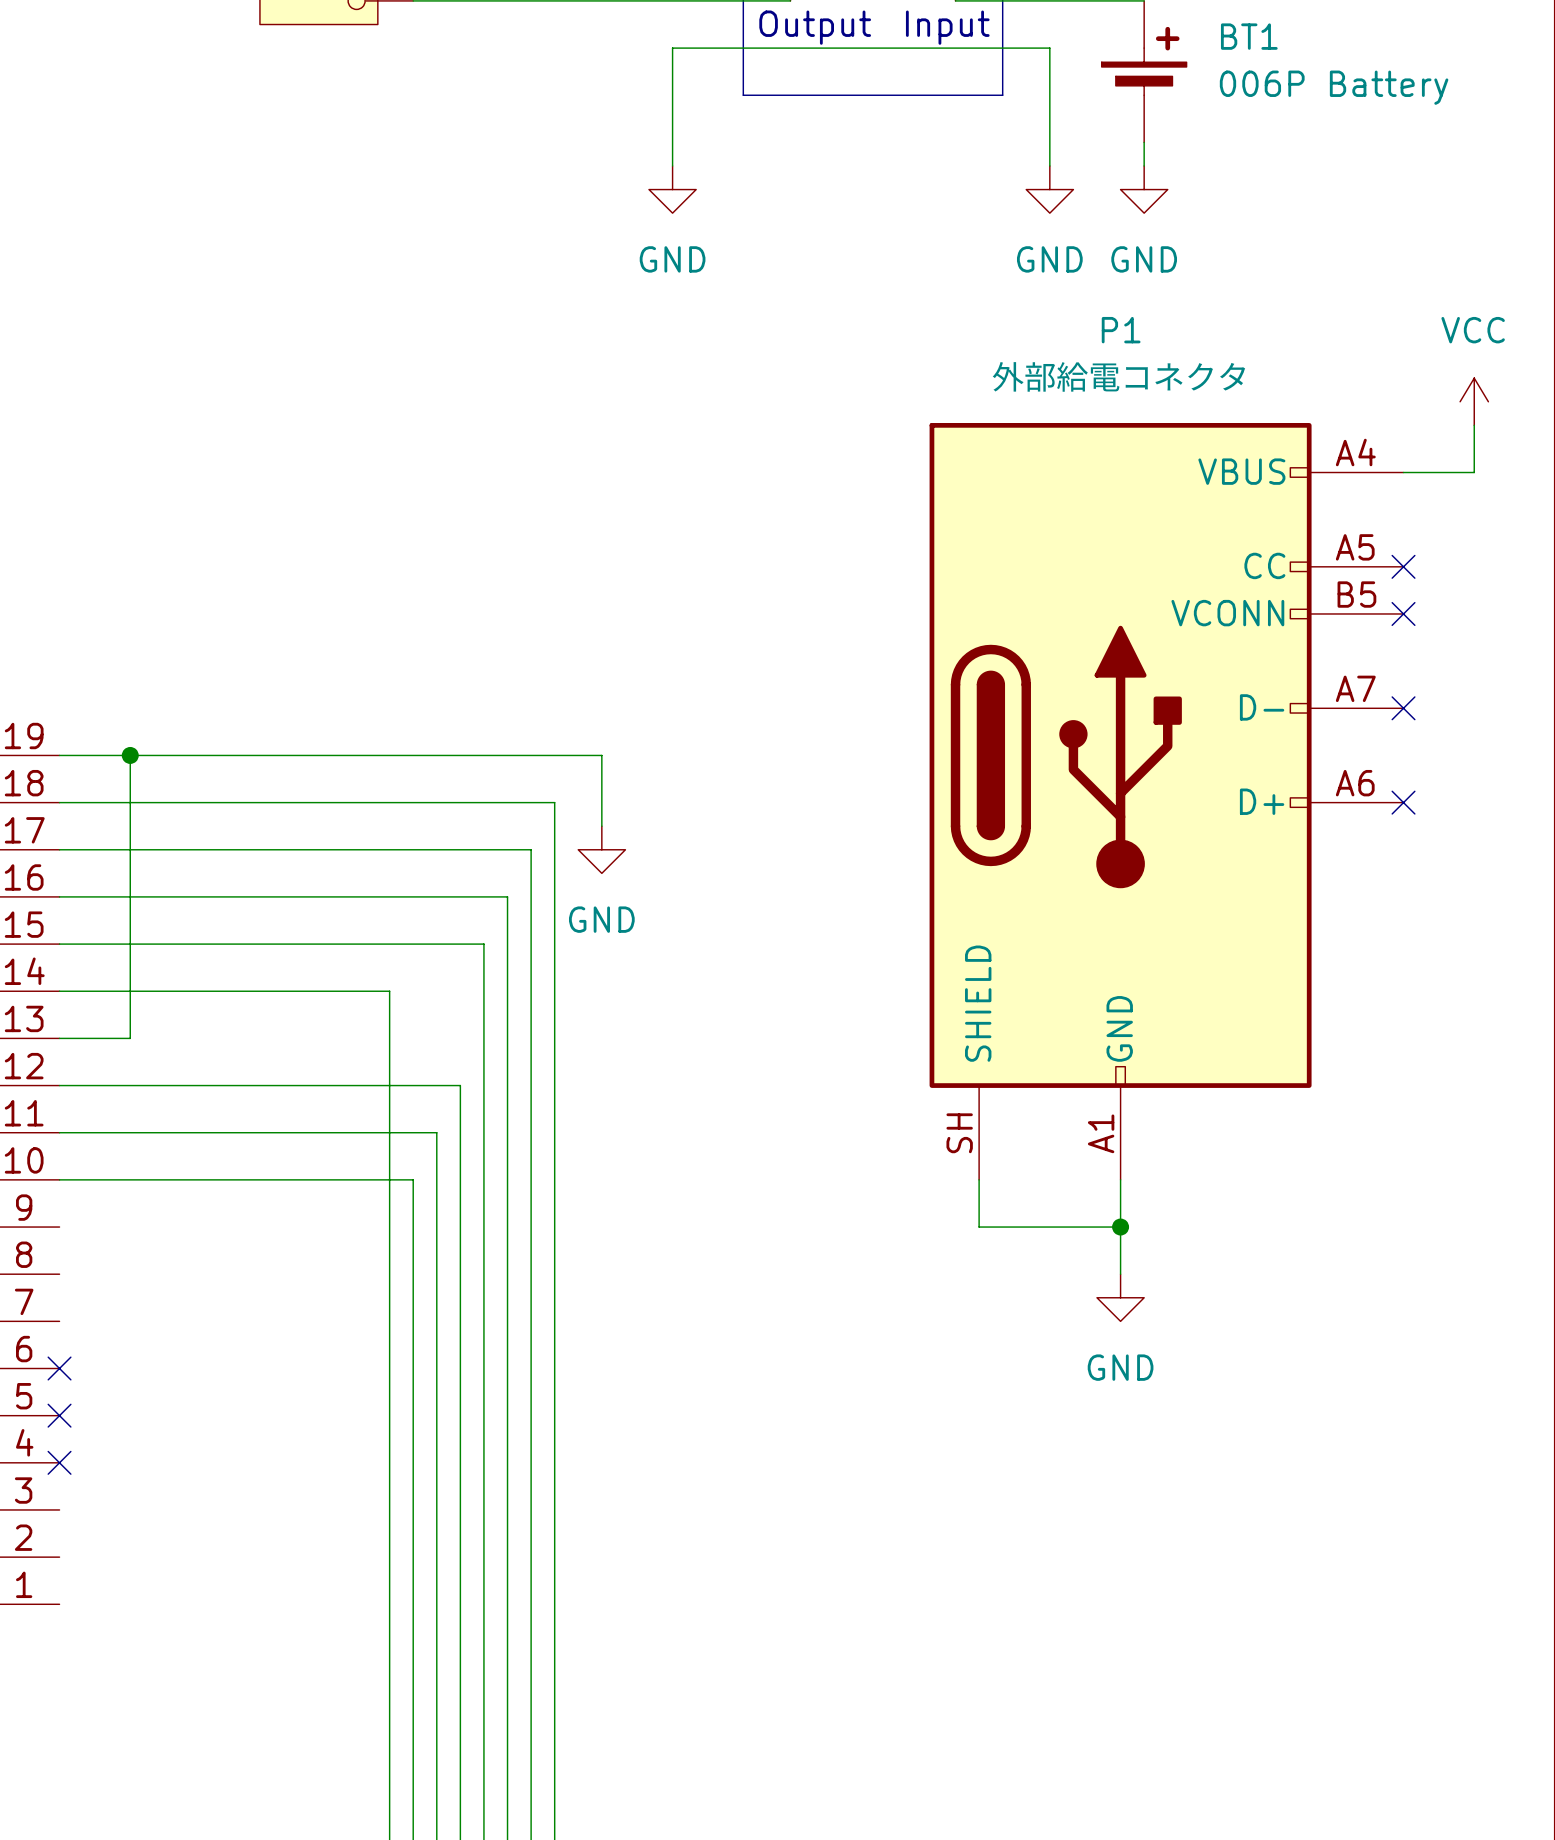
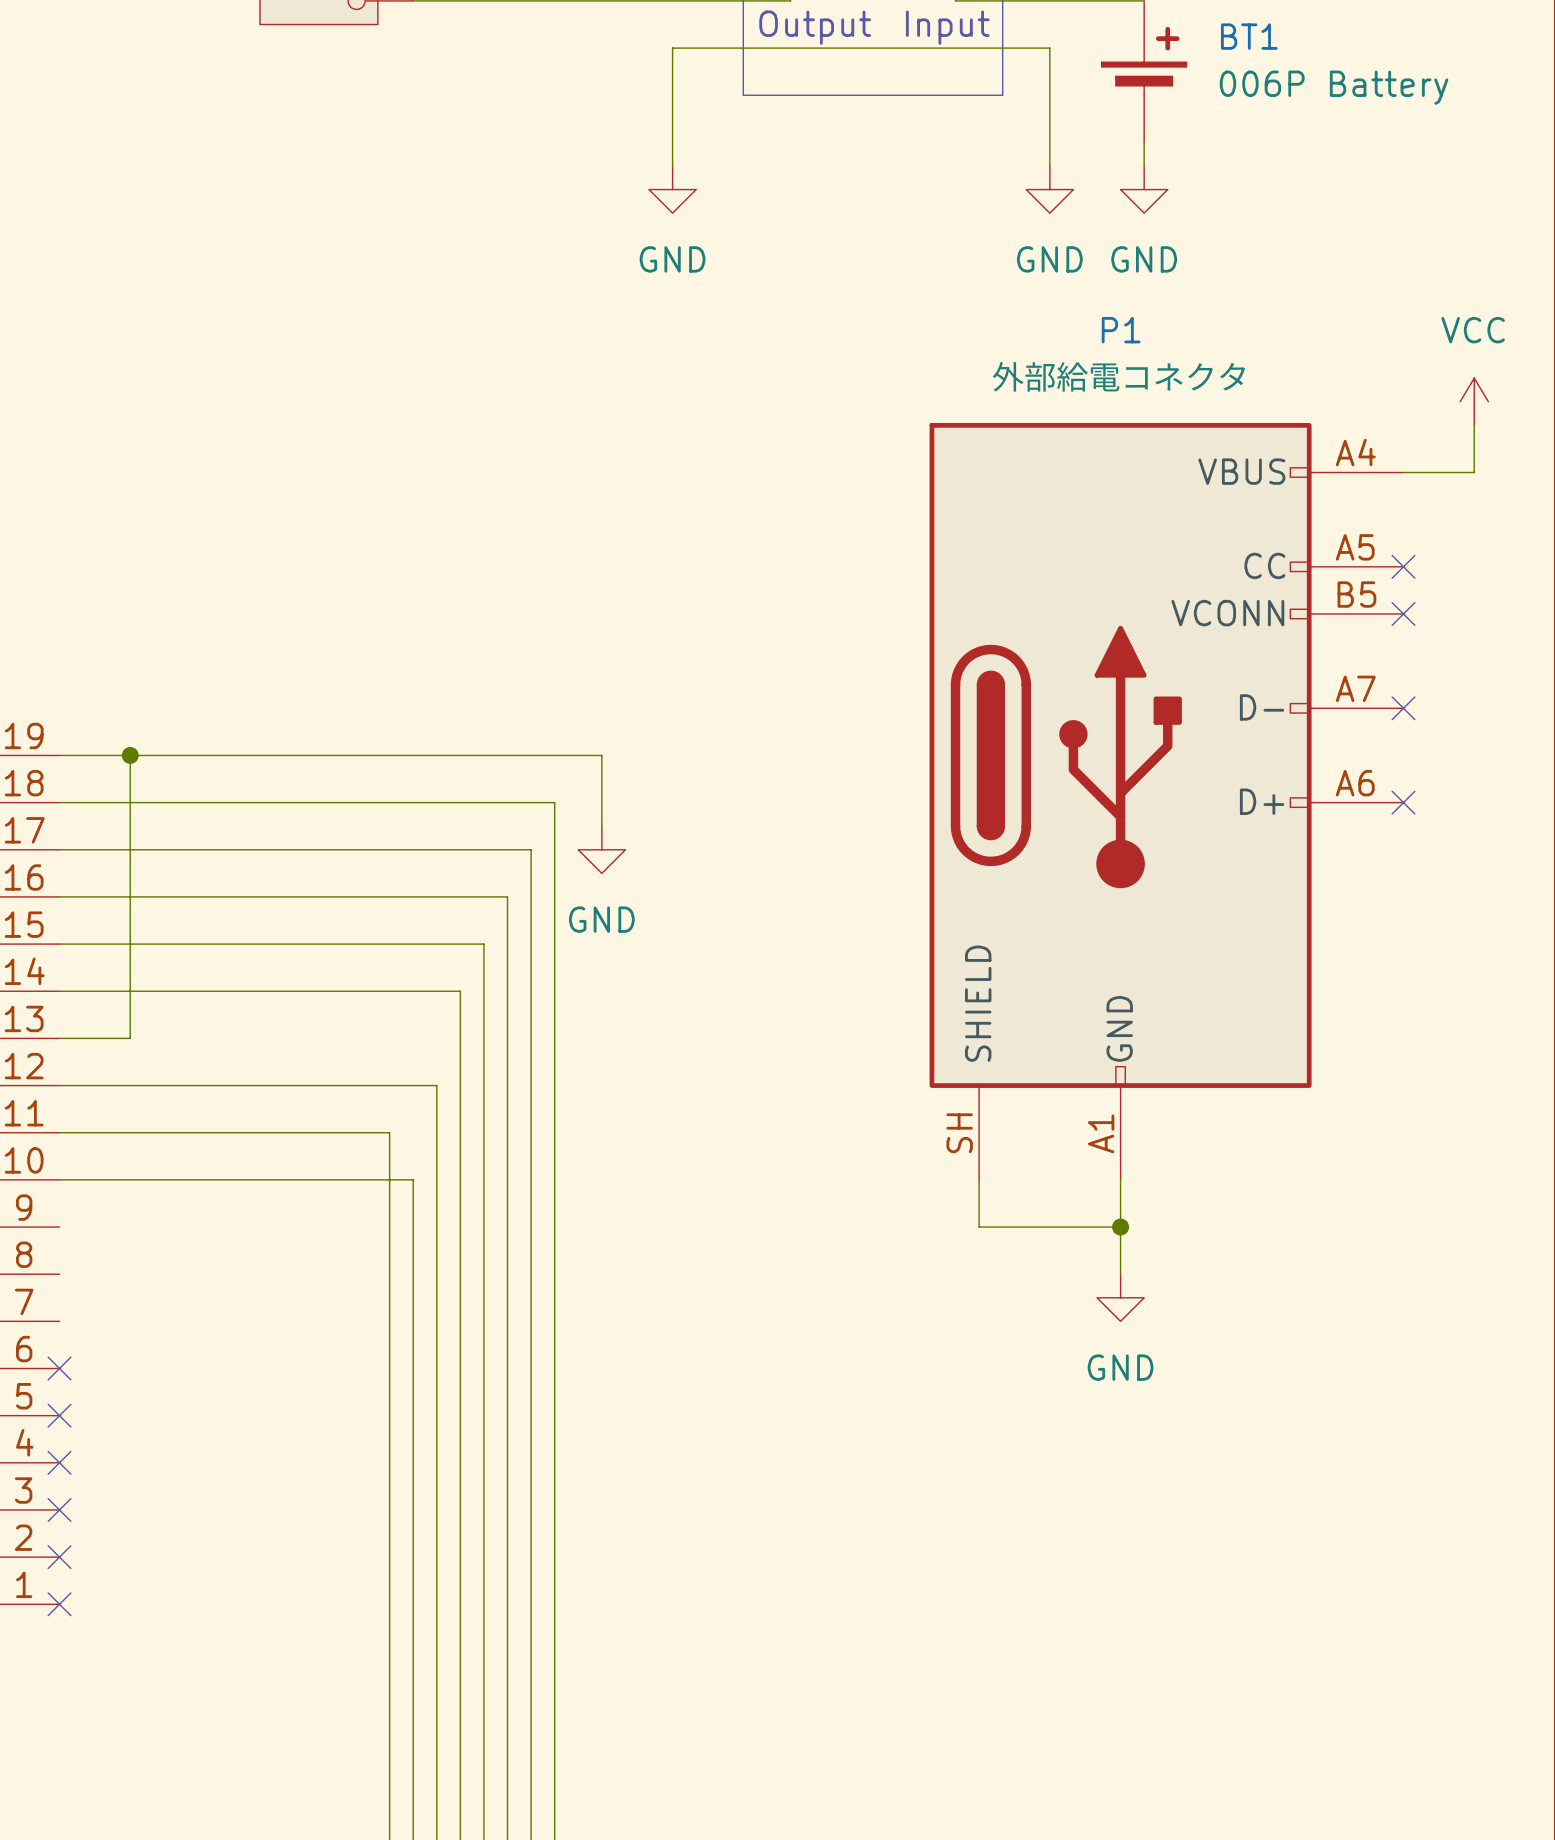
wire: (389, 991) (389, 1132) (436, 1132) -> (389, 991) (460, 991) (460, 1085)
wire: (436, 1085) (460, 1085) -> (436, 1085) (436, 1132)
no-connect mark: none -> (59, 1509)
no-connect mark: none -> (59, 1557)
no-connect mark: none -> (59, 1604)

